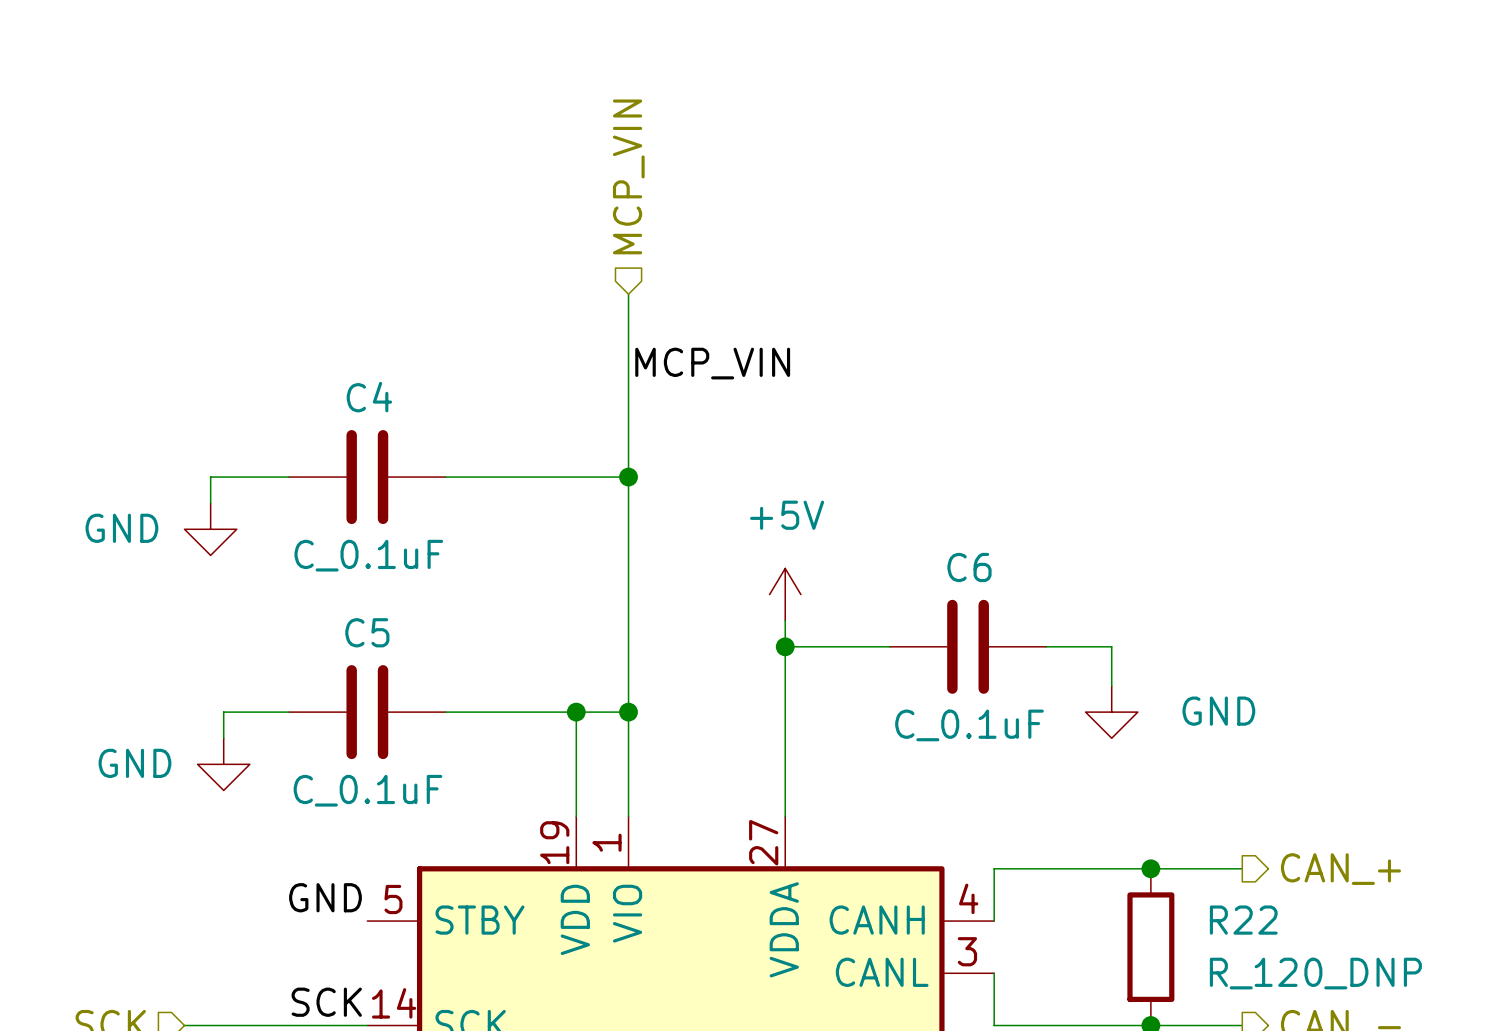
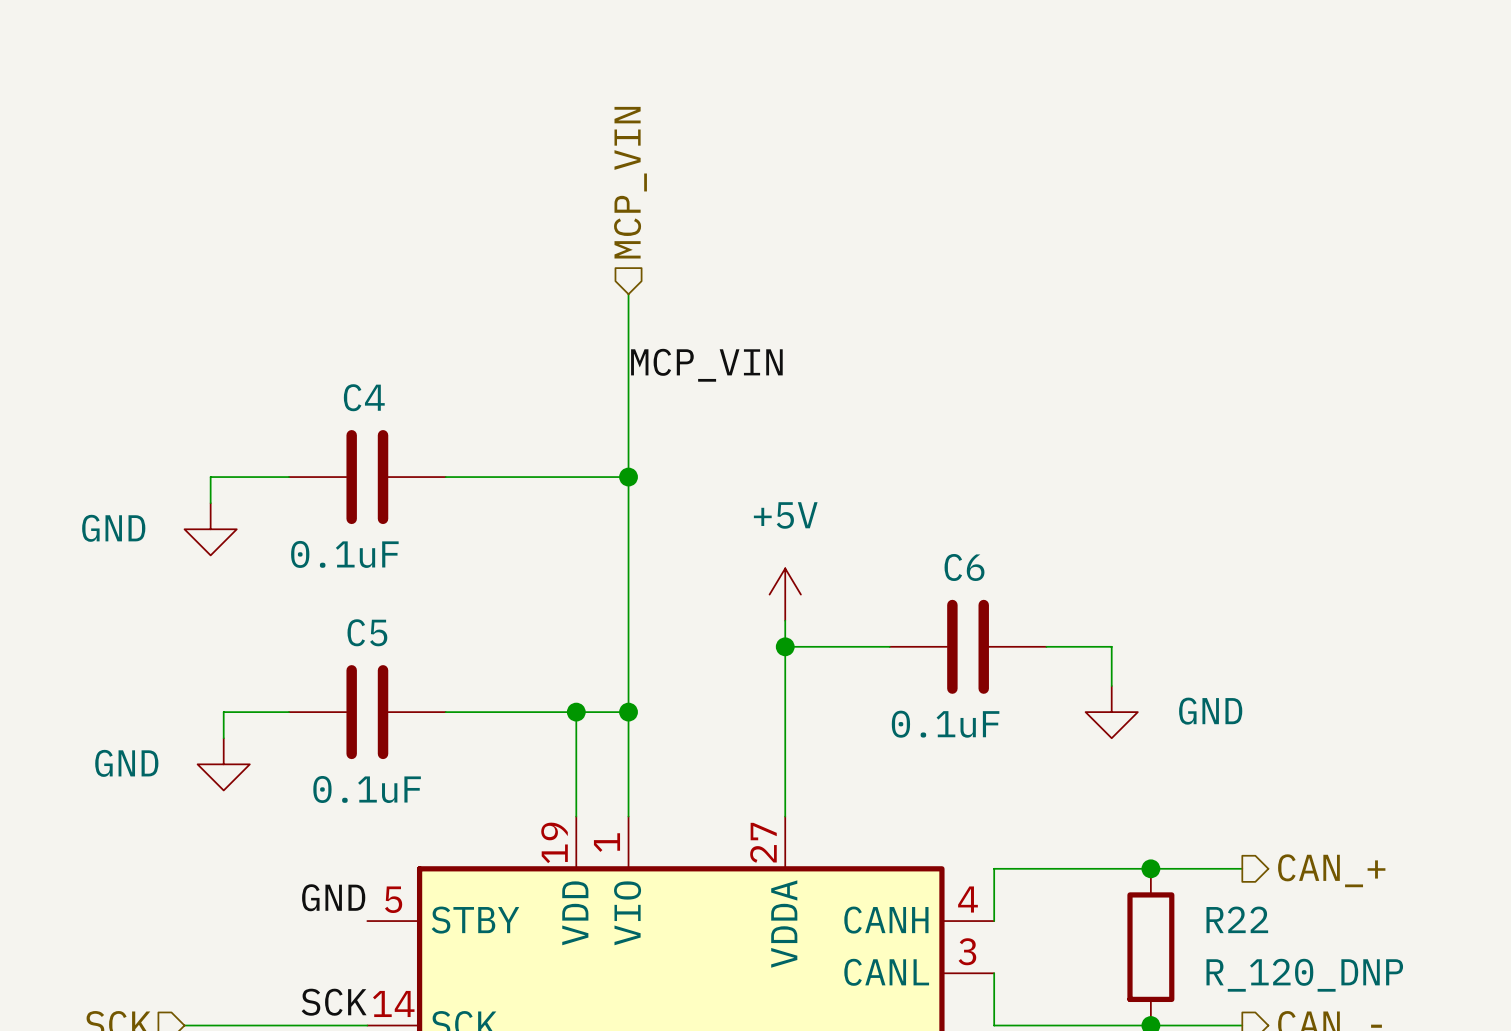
C4 value: C_0.1uF (368, 555) -> 0.1uF (344, 554)
C6 value: C_0.1uF (969, 725) -> 0.1uF (945, 724)
C5 value: C_0.1uF (367, 790) -> 0.1uF (367, 789)

